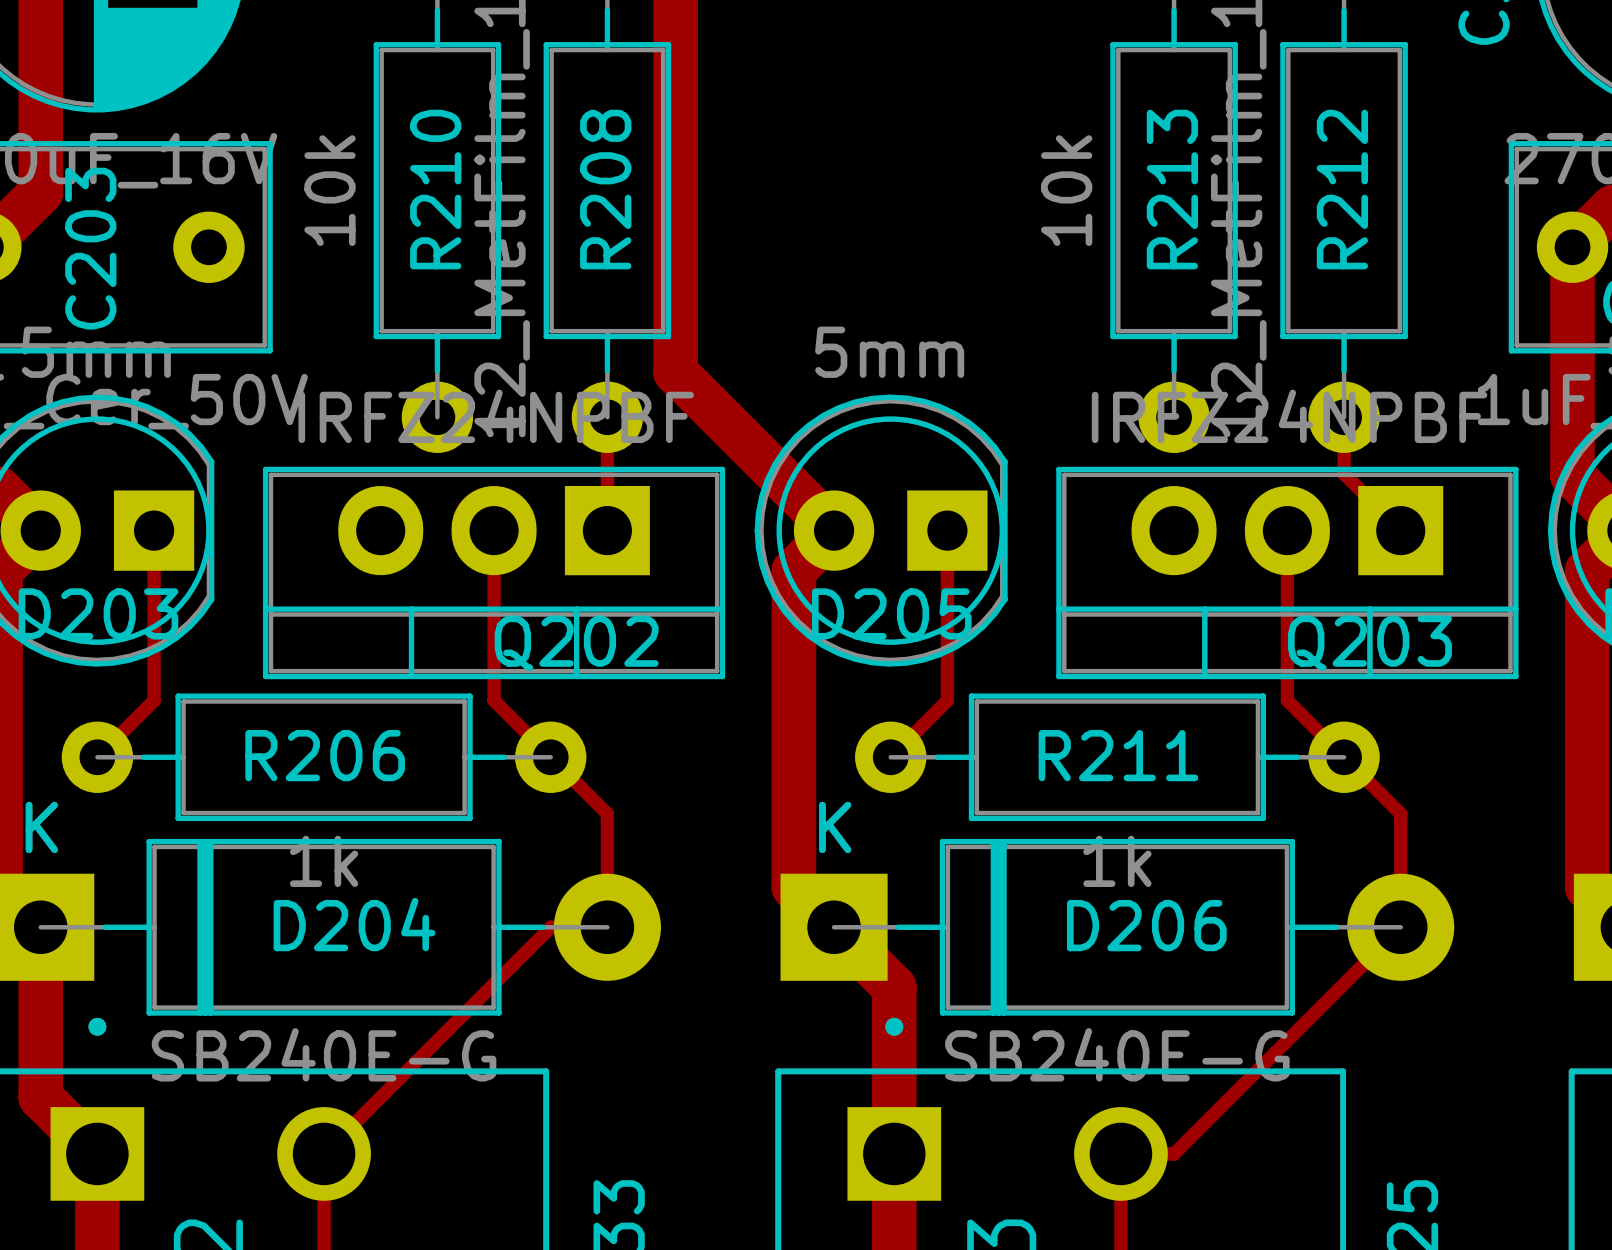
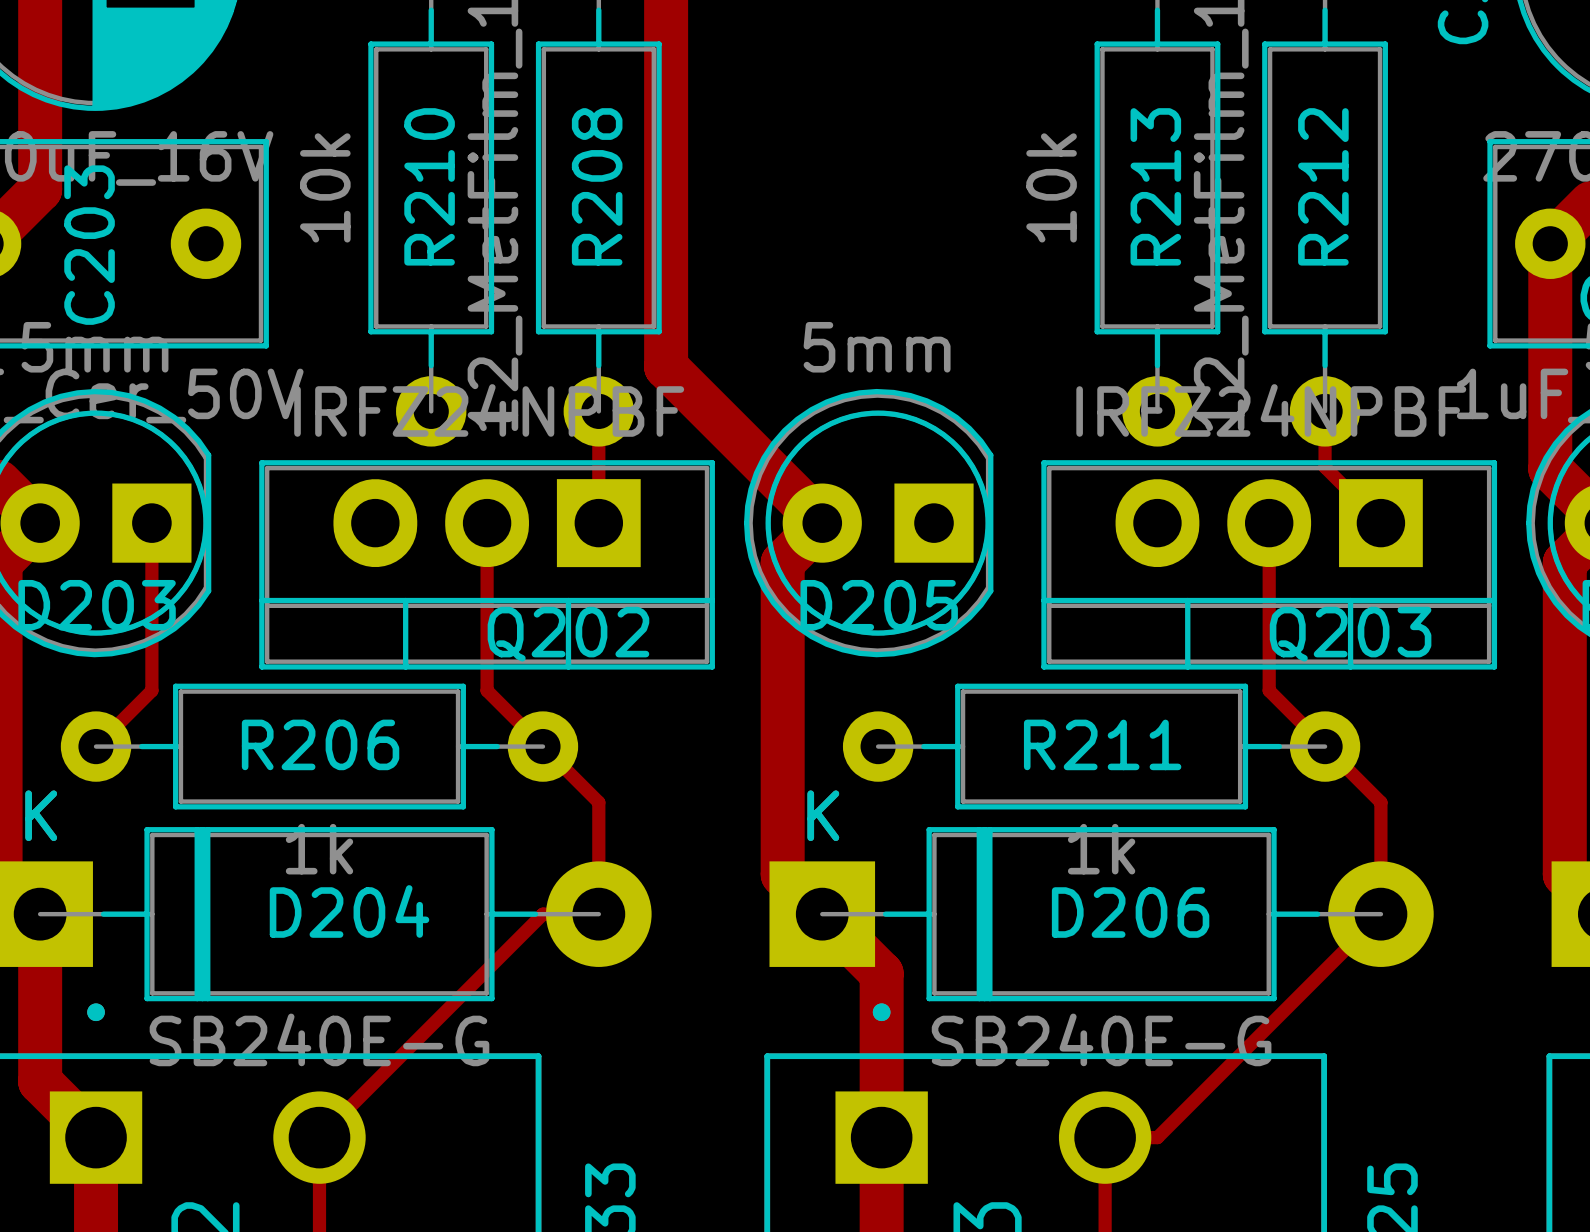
top track: (947, 530) (947, 700) (890, 757) -> none

